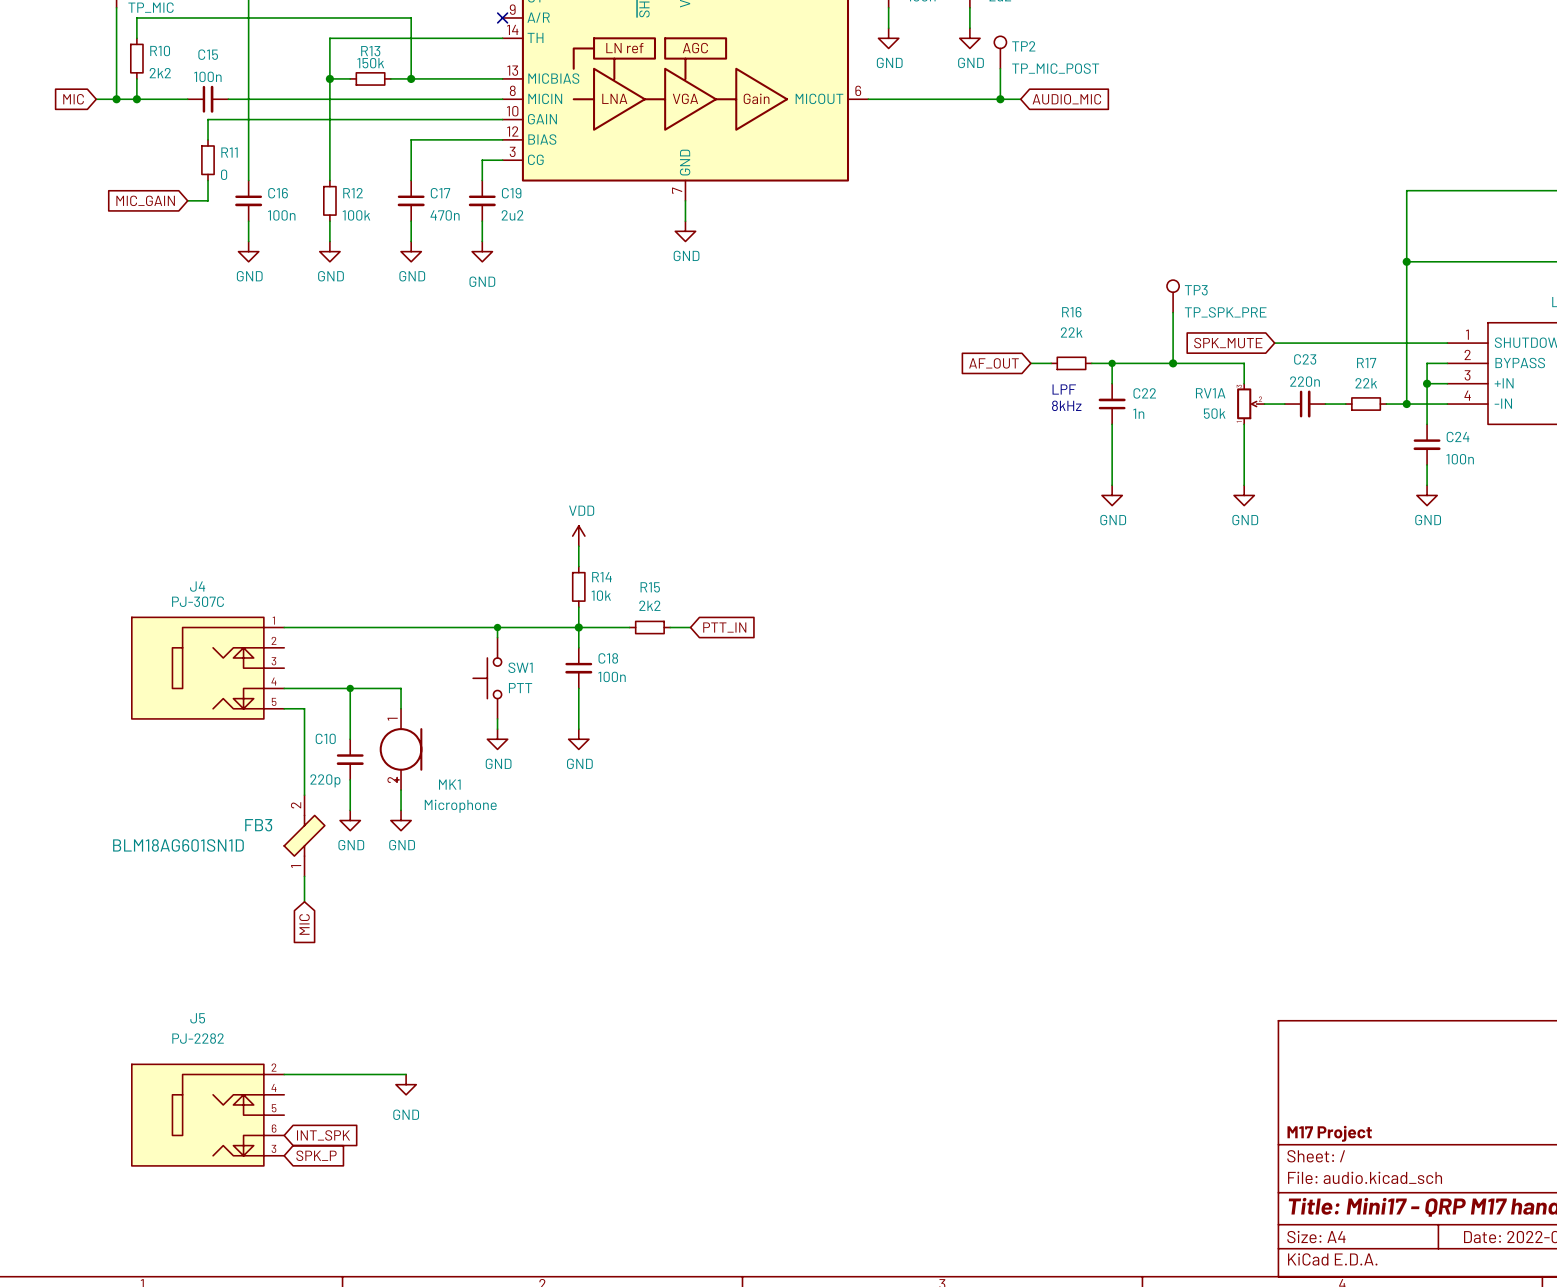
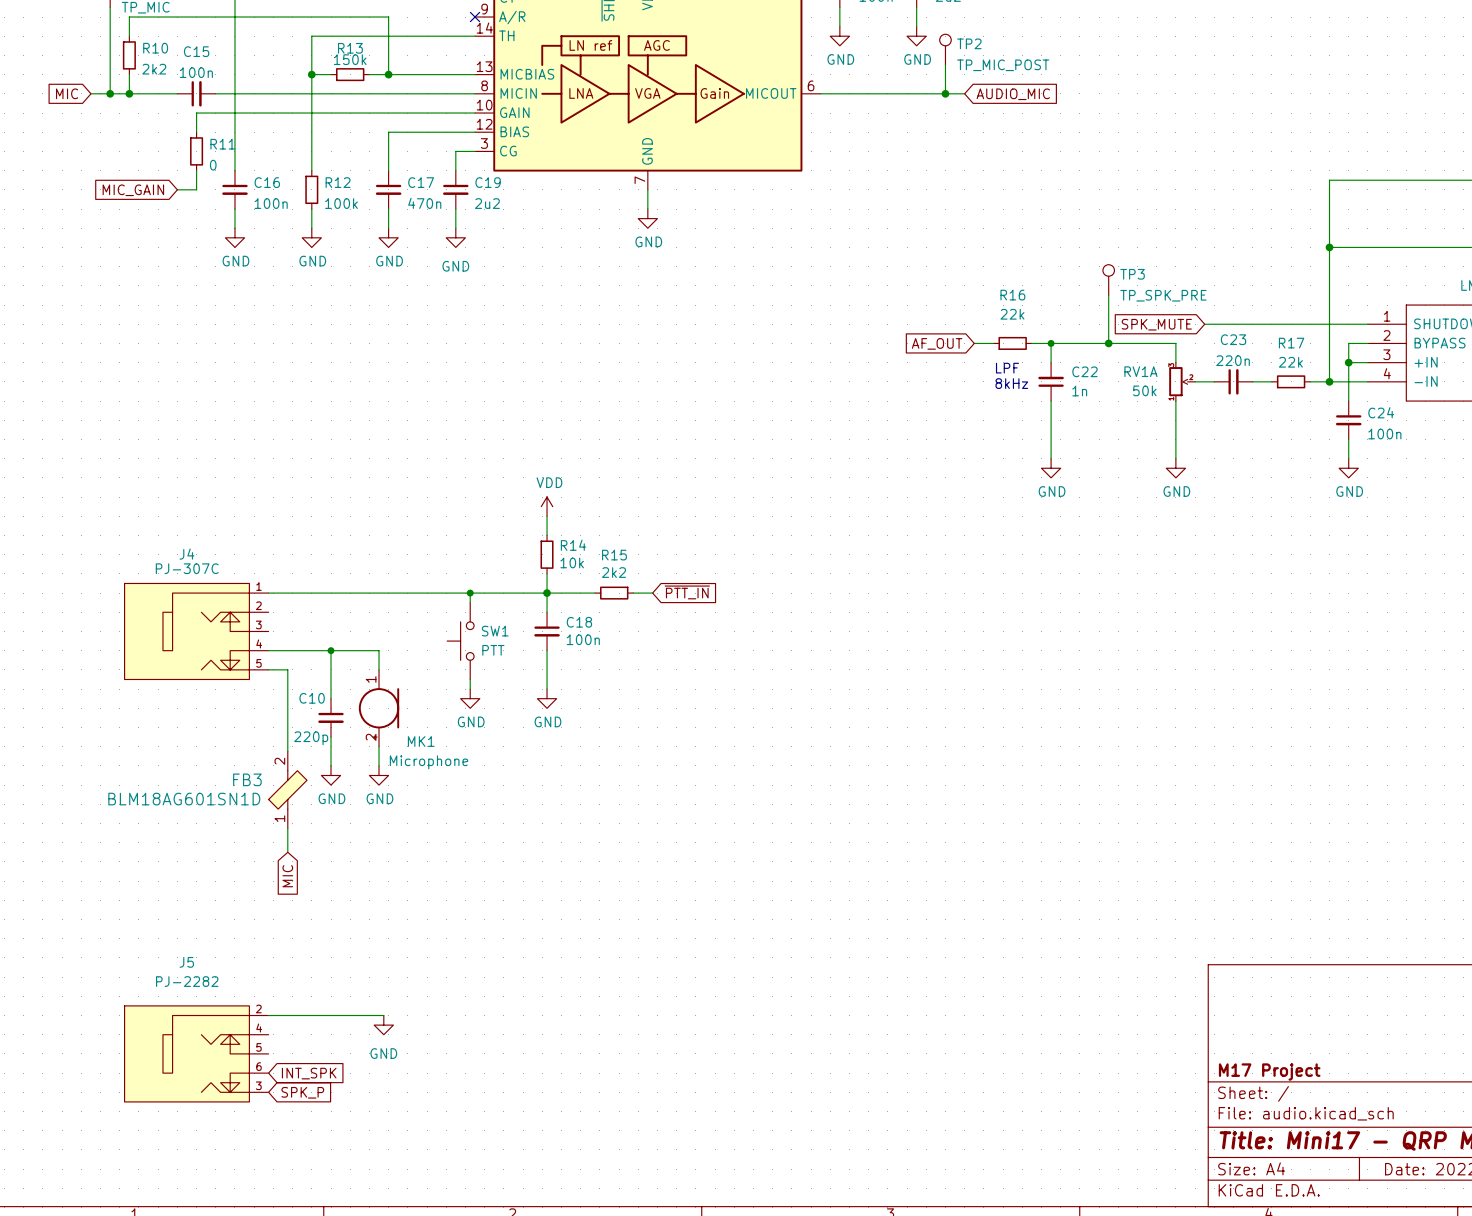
global label: PTT_IN (724, 627) -> ~{PTT_IN} (687, 592)

